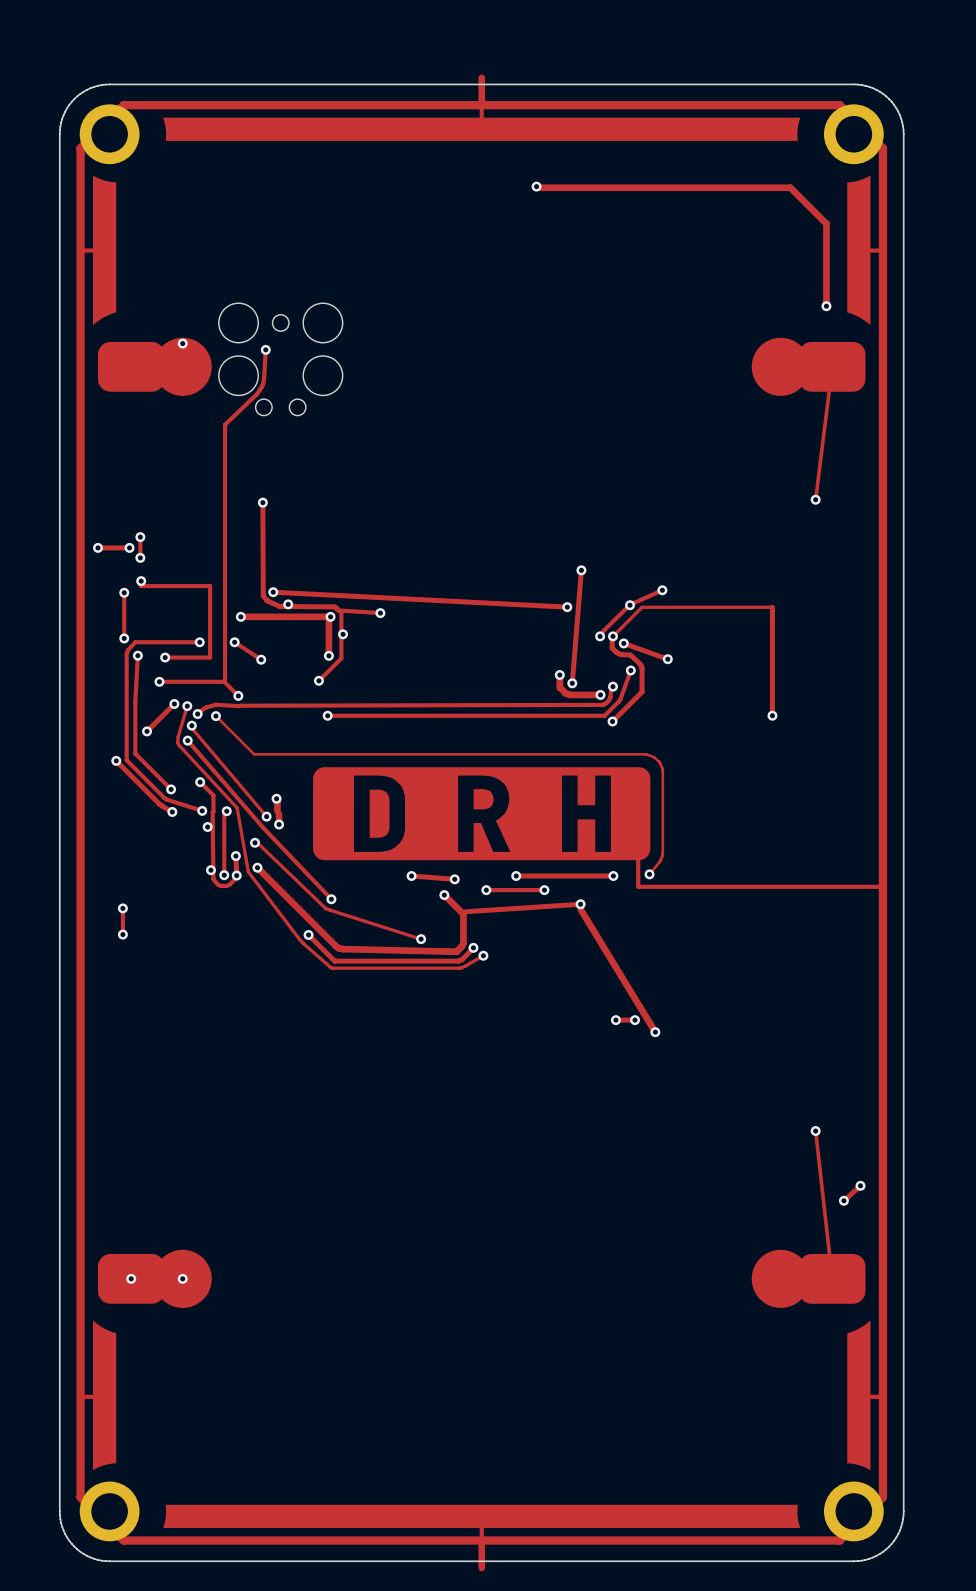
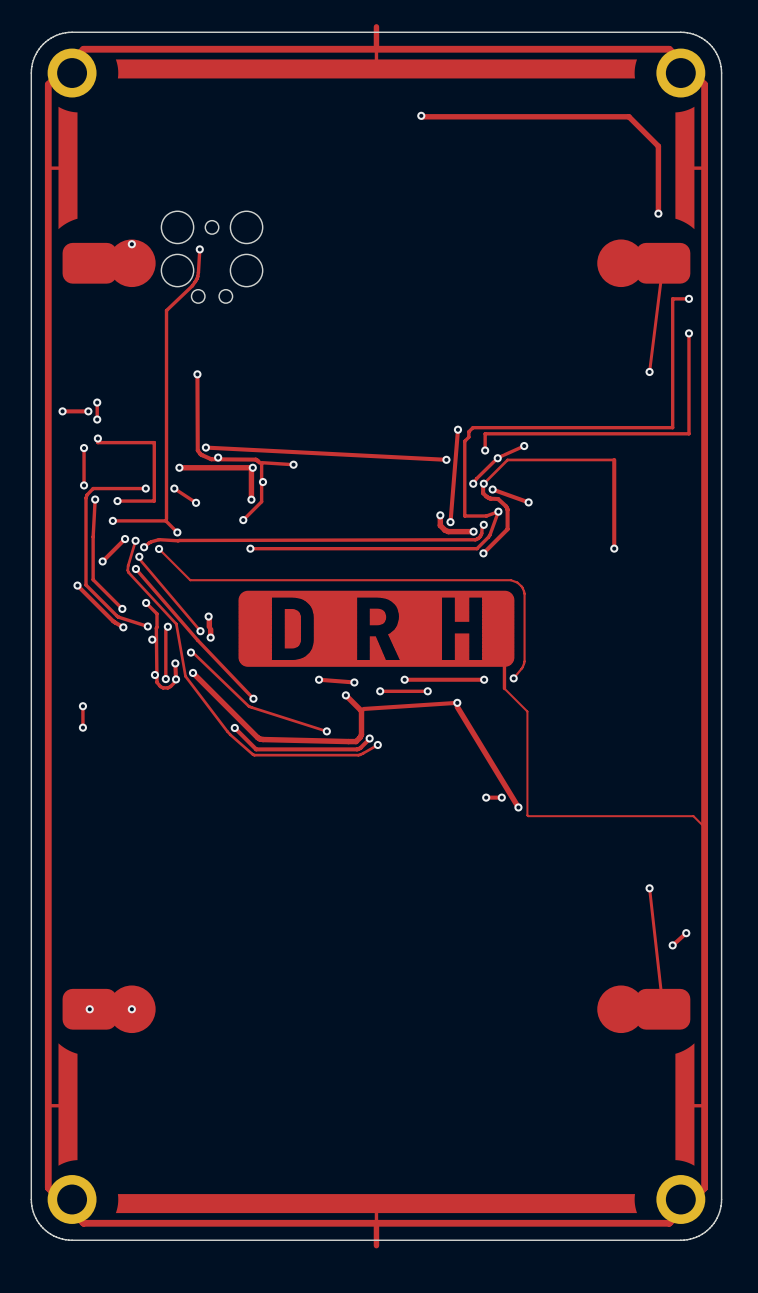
track: none -> (688, 298) (672, 298) (672, 427) (472, 427) (468, 431) (468, 437) (464, 441) (464, 516) (486, 516) (498, 511)
via: none -> (688, 298)
track: none -> (688, 333) (688, 433) (485, 433) (485, 450)
via: none -> (688, 333)
via: none -> (485, 450)
track: (638, 886) (882, 886) -> (504, 688) (527, 711) (528, 816) (693, 816) (704, 827) (704, 1187)

